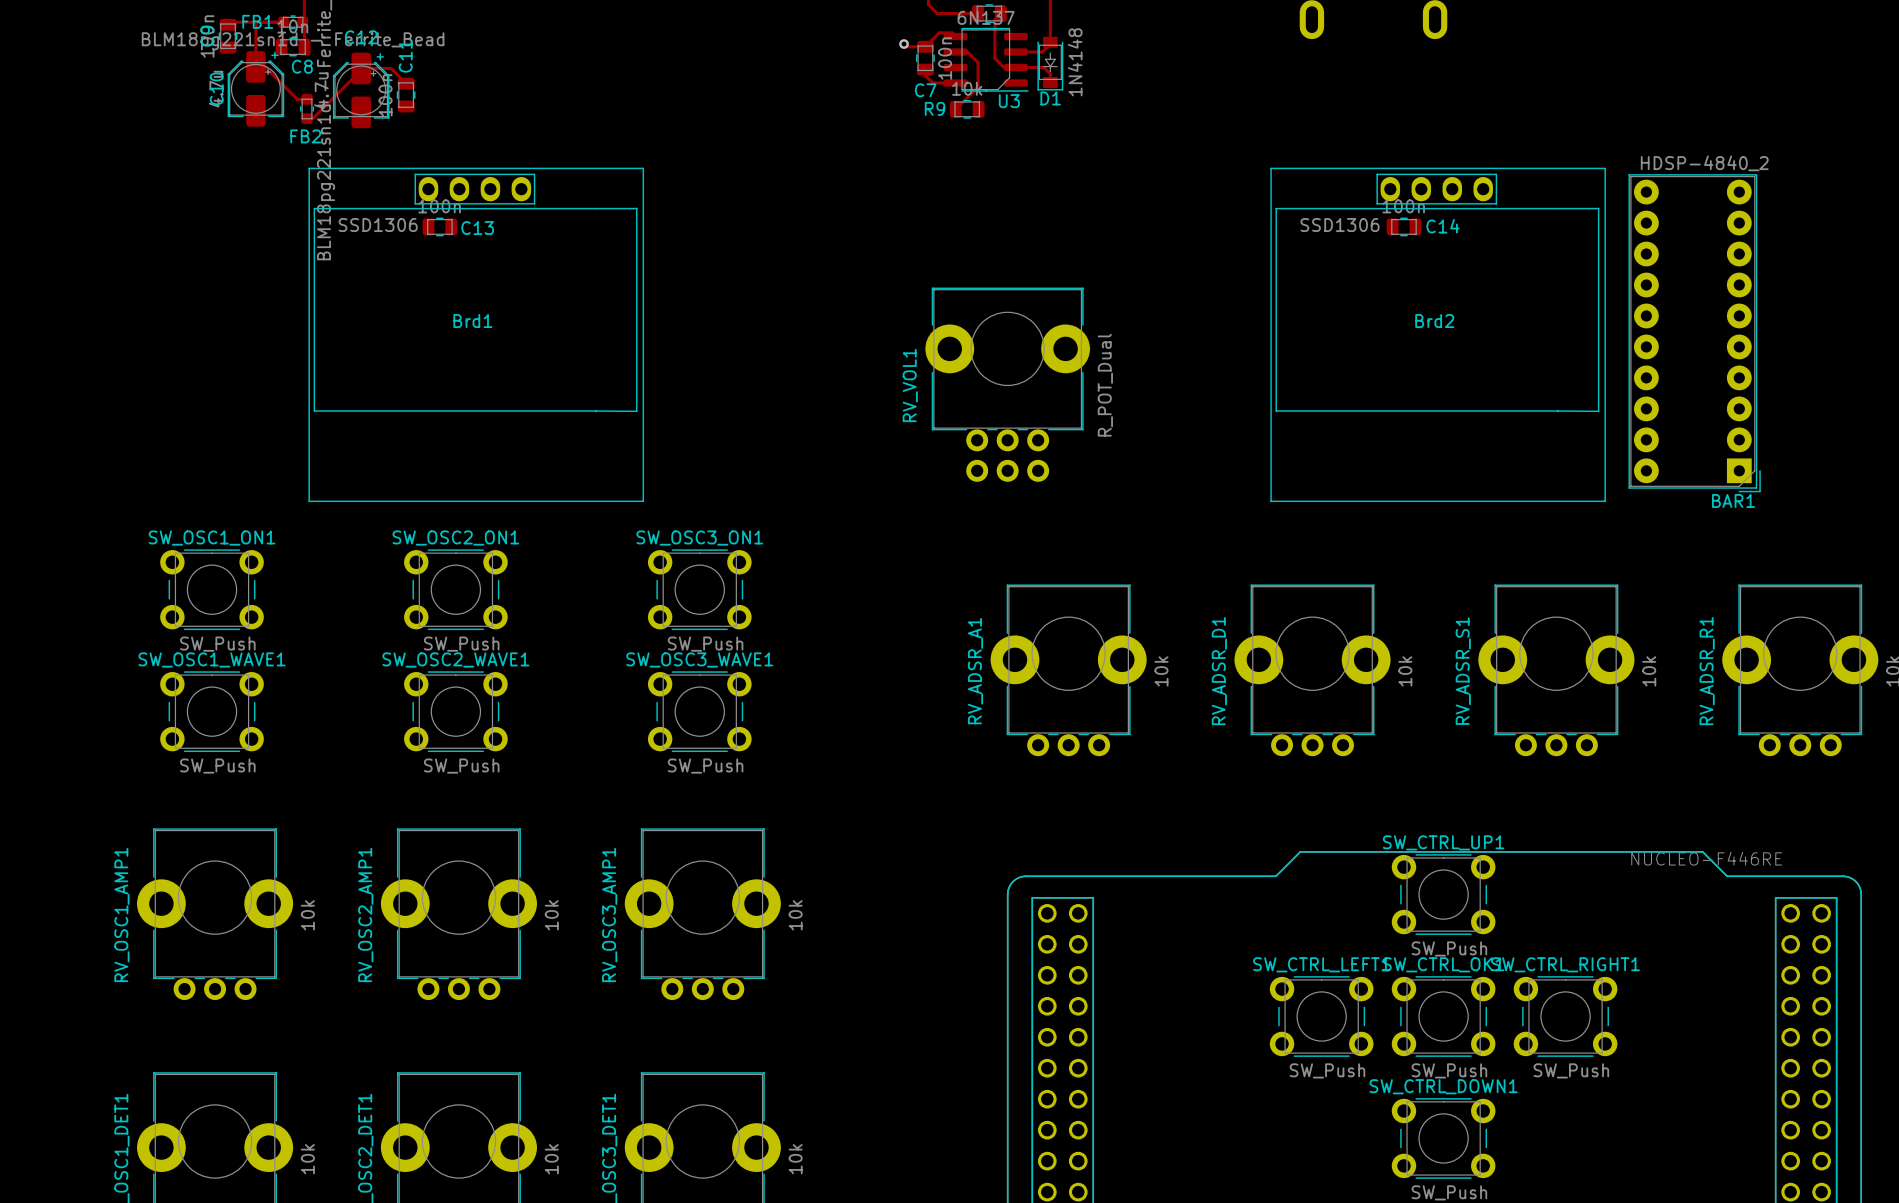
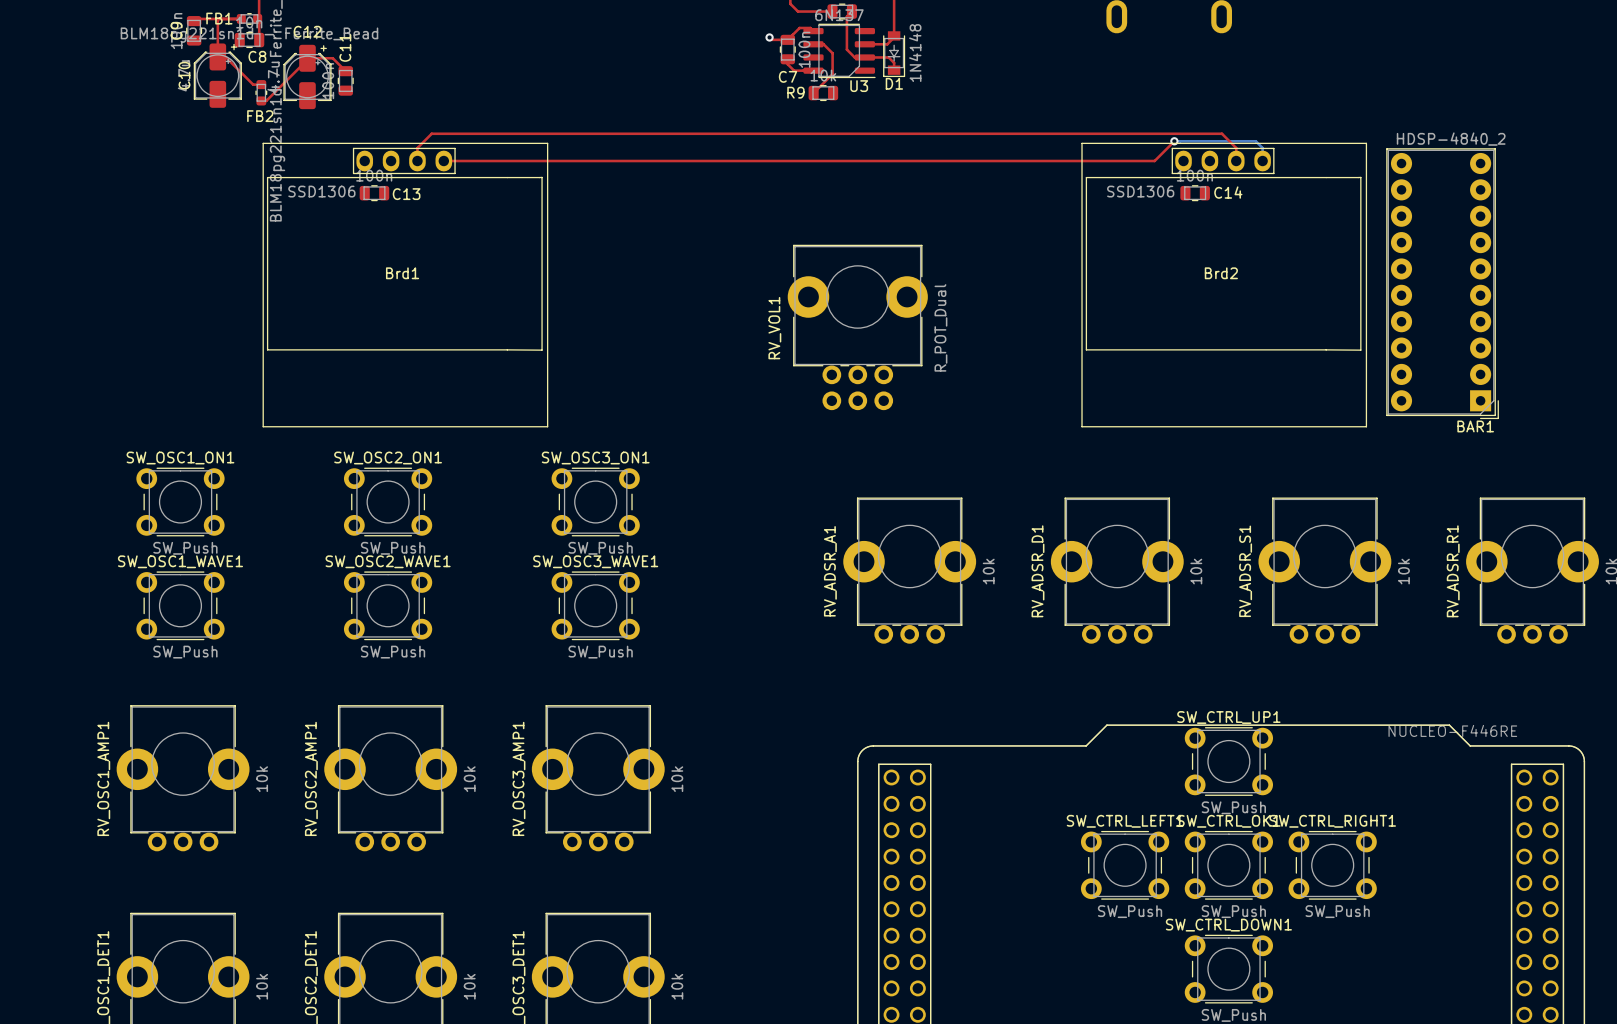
top track: none -> (1174, 141) (1154, 161) (443, 161)
bottom track: none -> (1174, 141) (1255, 141) (1262, 148) (1262, 161)
via: none -> (1174, 141)
top track: none -> (417, 161) (417, 148) (431, 133) (1221, 133) (1236, 148) (1236, 161)

